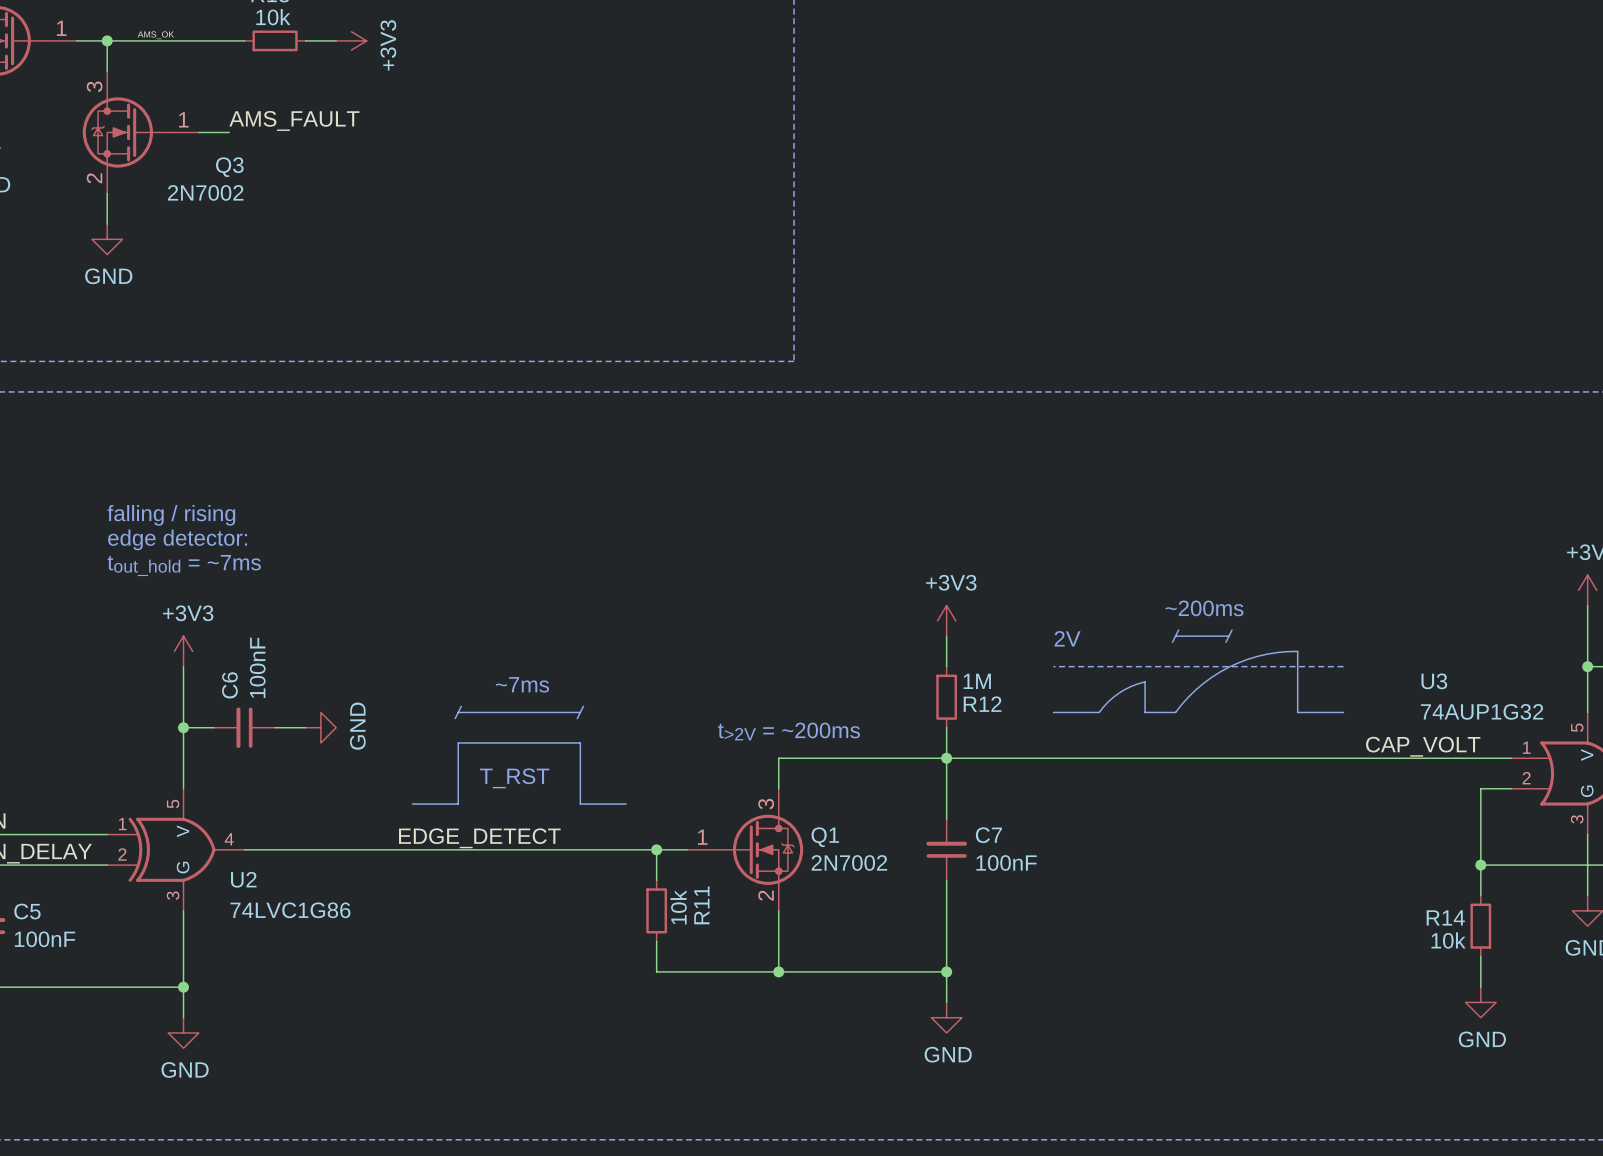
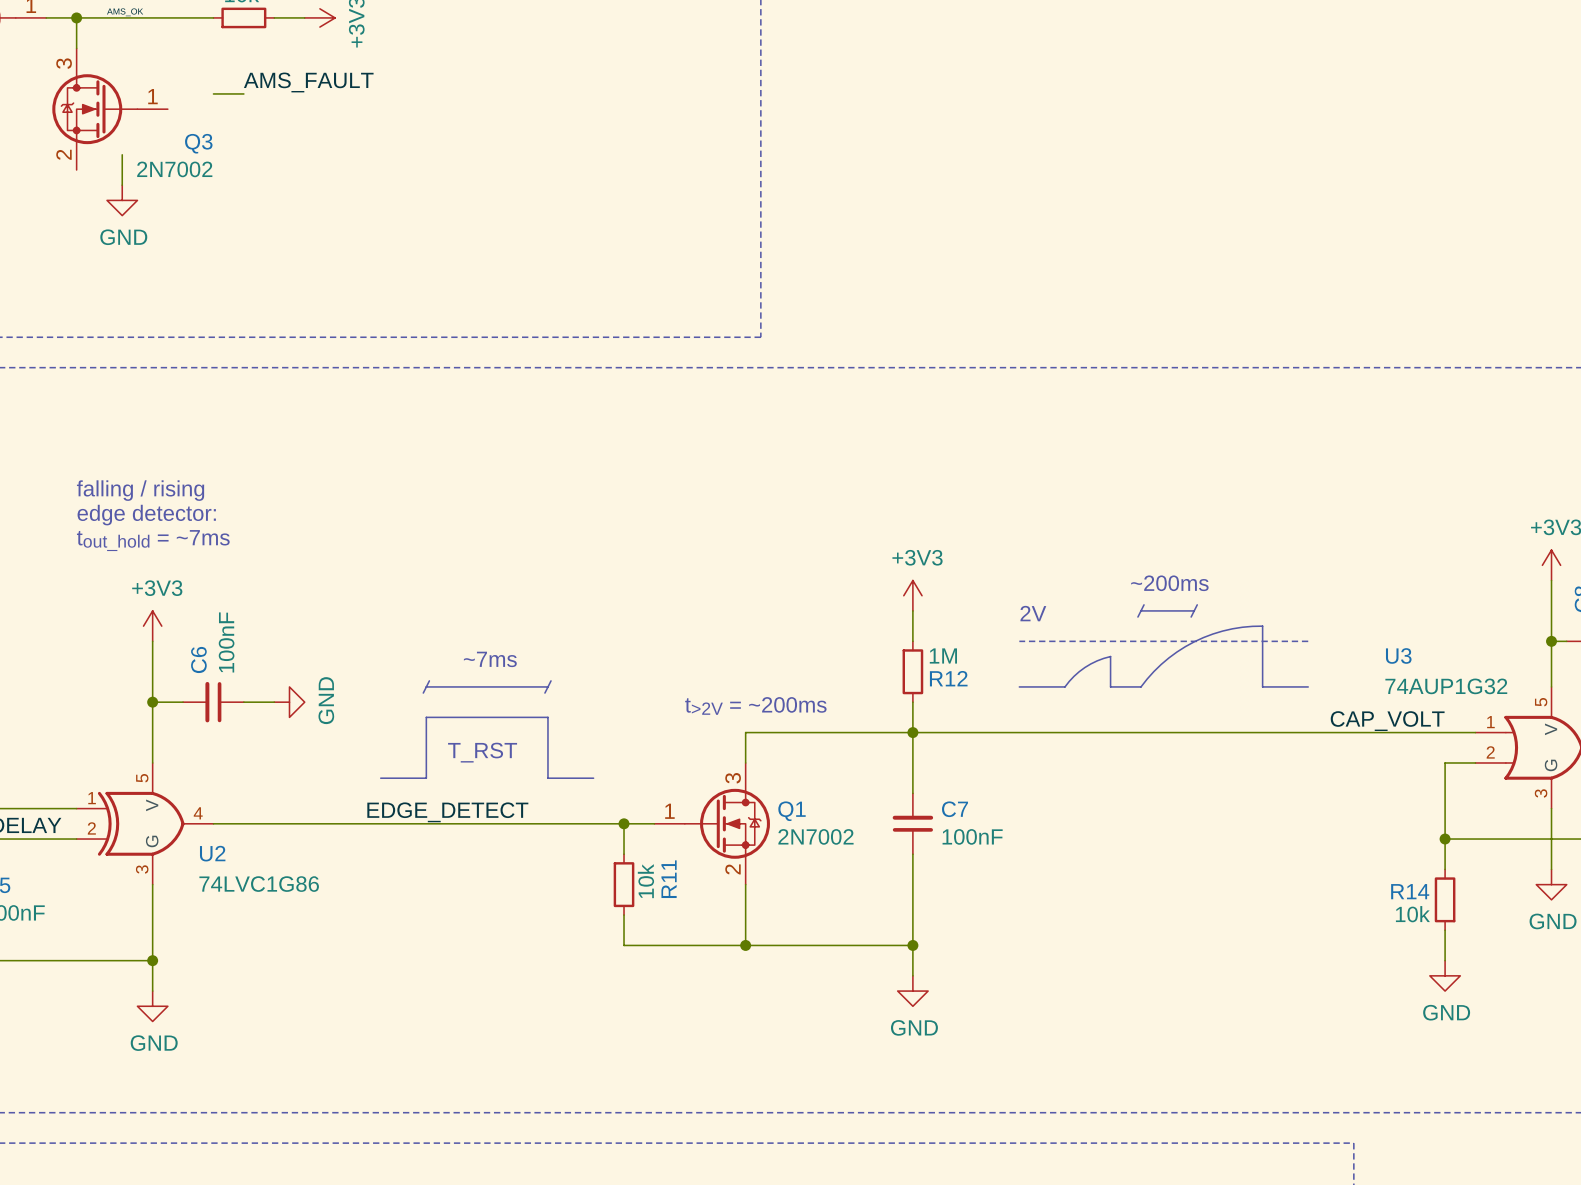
label position: AMS_FAULT (294, 120) -> AMS_FAULT (308, 82)
wire: (198, 132) (229, 132) -> (213, 93) (243, 93)
wire: (107, 193) (107, 224) -> (122, 154) (122, 185)
power symbol position: GND (107, 239) -> GND (122, 200)

